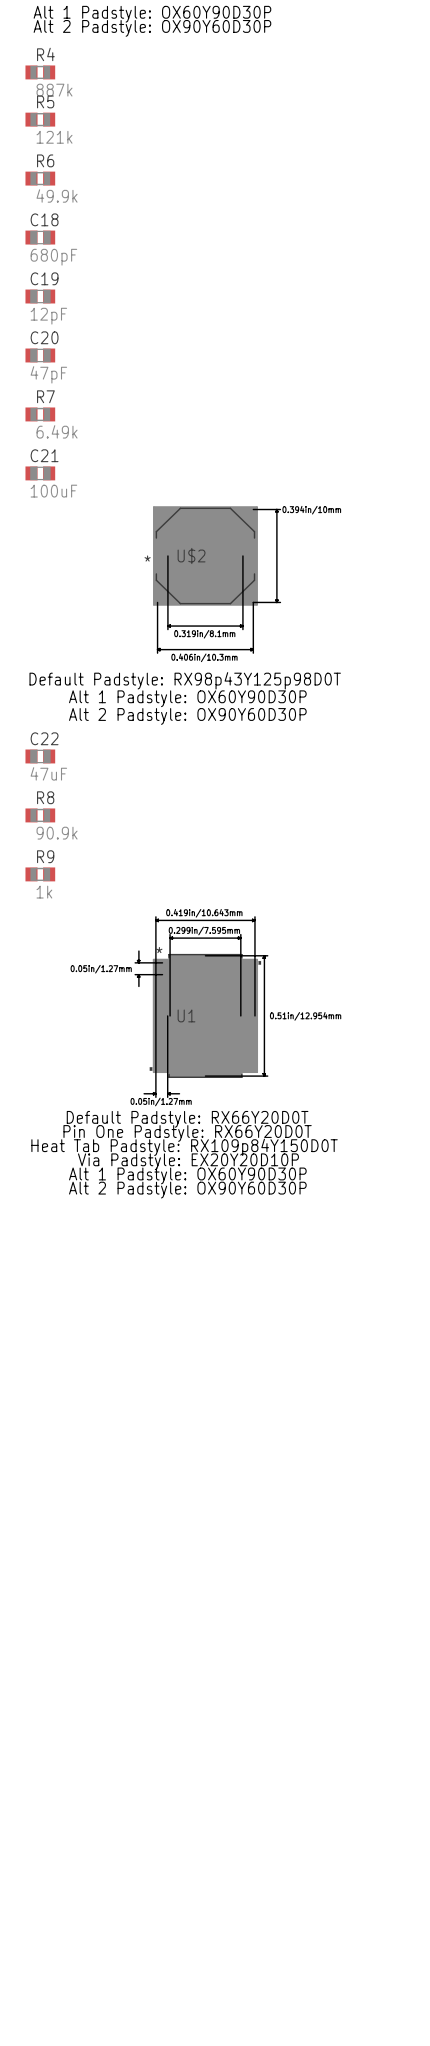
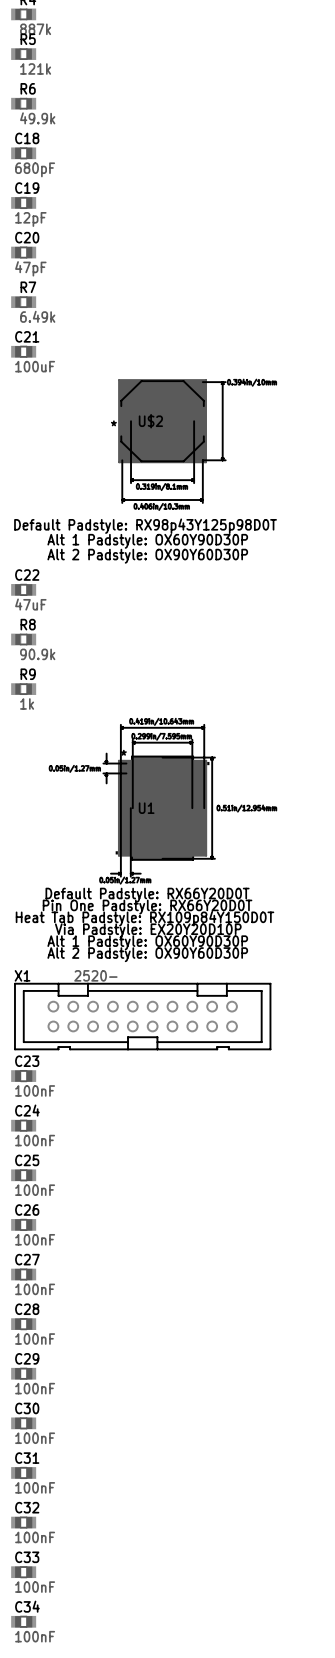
X1: none -> 2520- (142, 1016)
C23: none -> 100nF (23, 1076)
C24: none -> 100nF (23, 1125)
C25: none -> 100nF (23, 1175)
C26: none -> 100nF (23, 1224)
C27: none -> 100nF (23, 1274)
C28: none -> 100nF (23, 1324)
C29: none -> 100nF (23, 1373)
C30: none -> 100nF (23, 1423)
C31: none -> 100nF (23, 1472)
C32: none -> 100nF (23, 1522)
C33: none -> 100nF (23, 1572)
C34: none -> 100nF (23, 1621)

